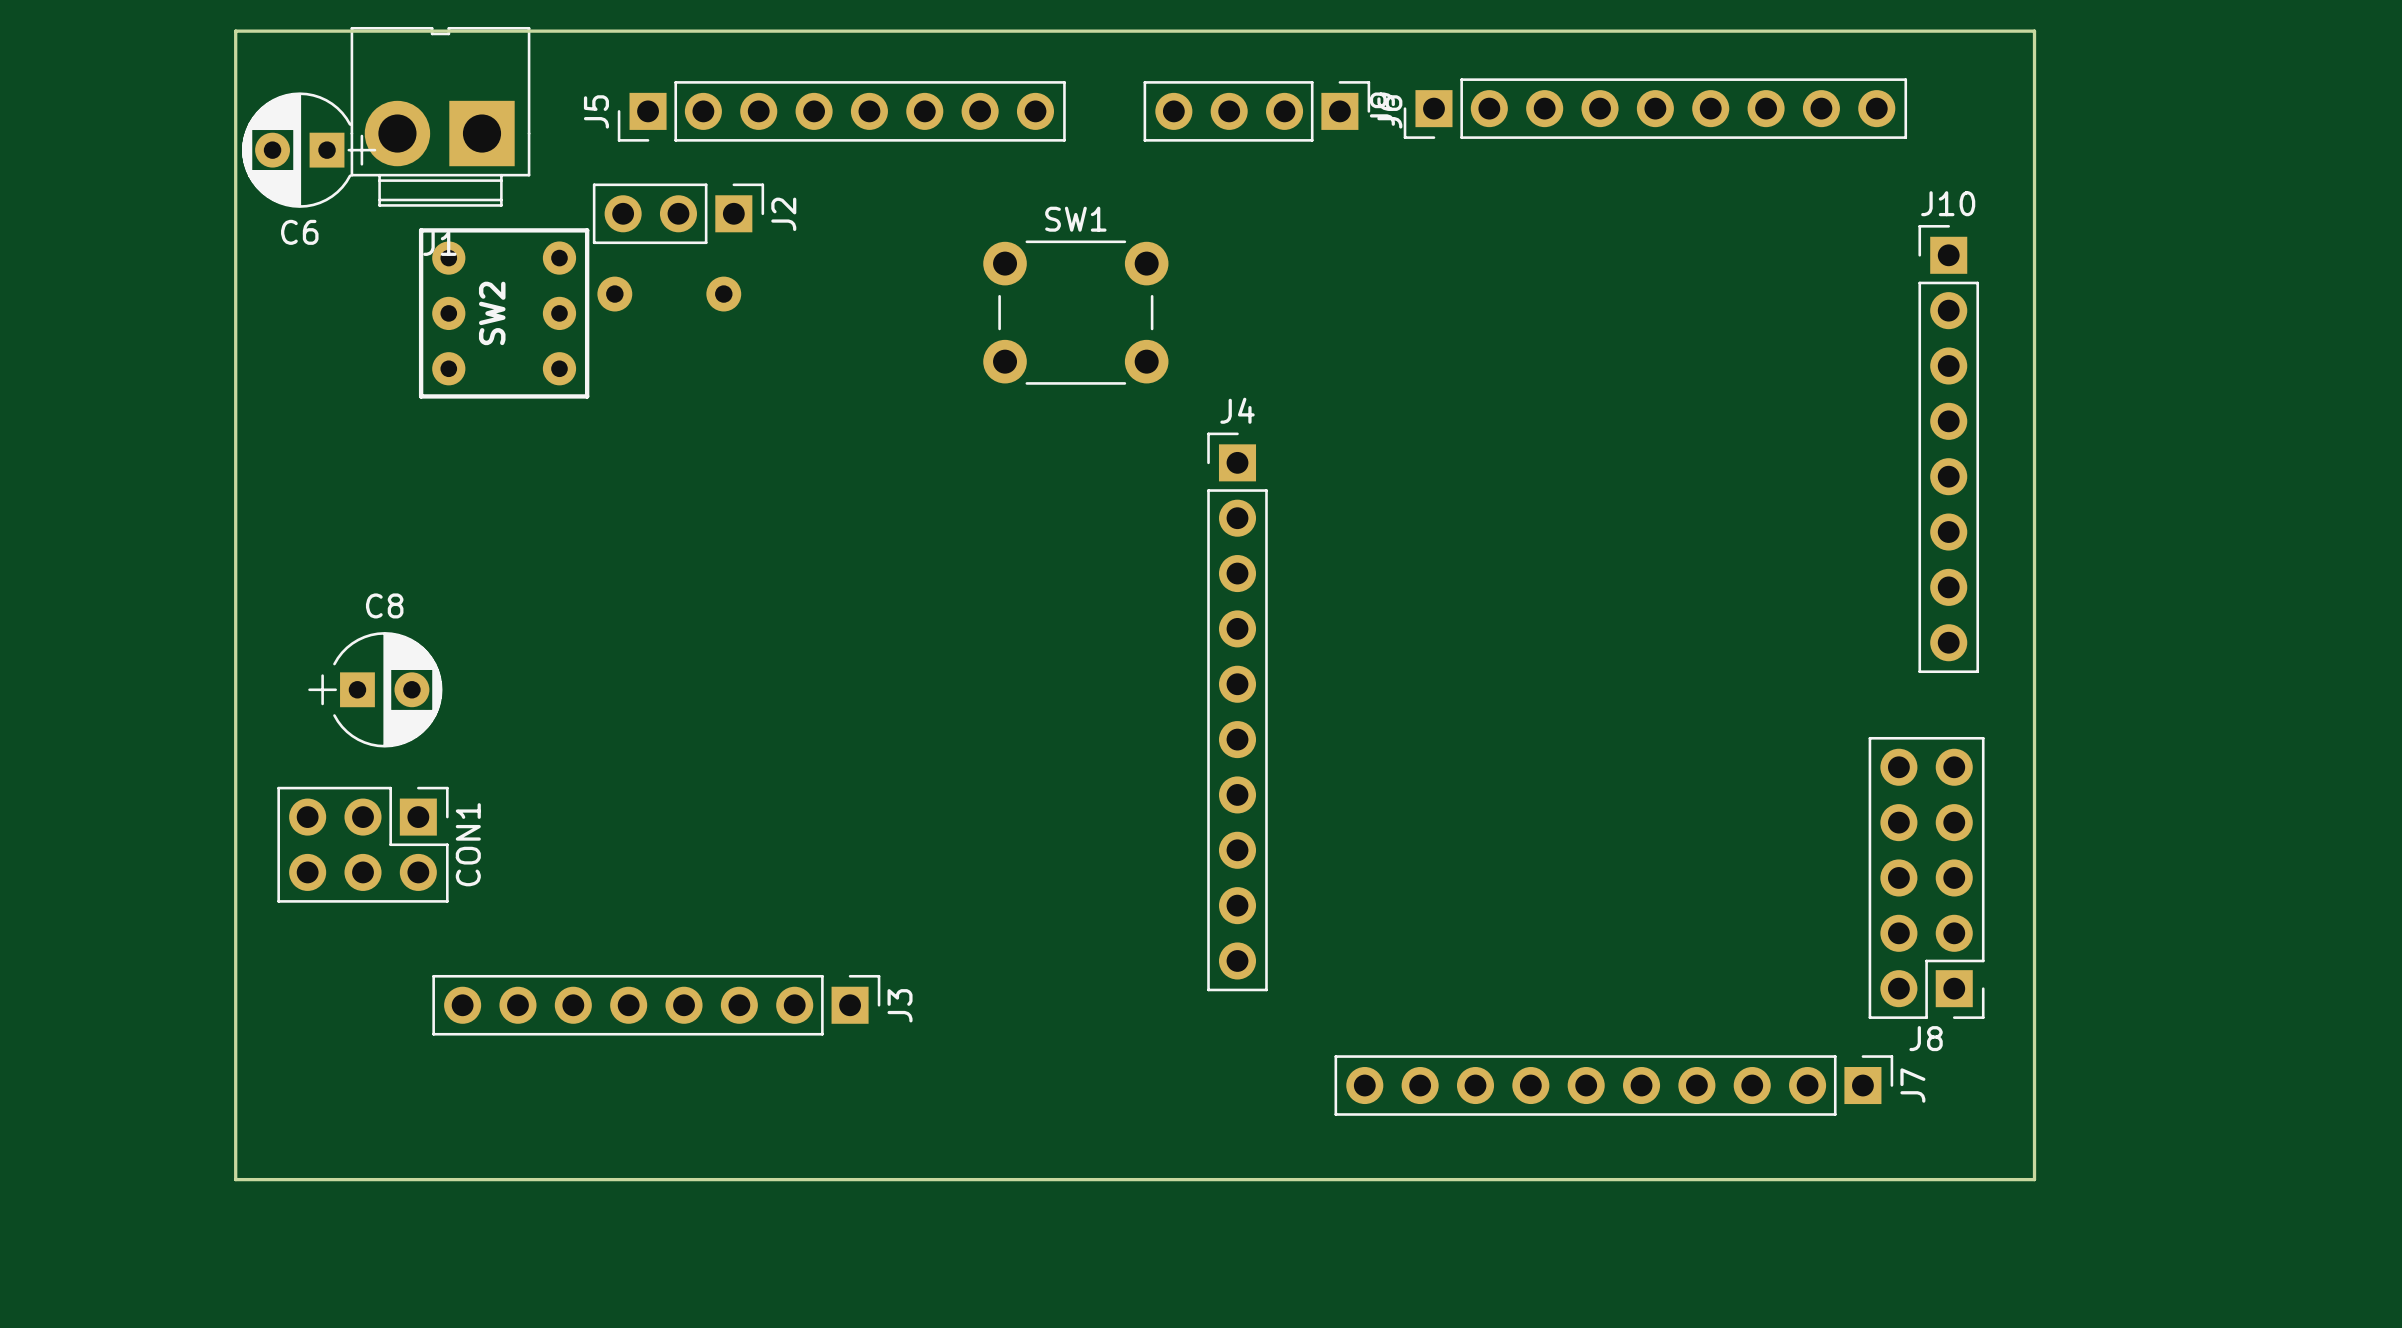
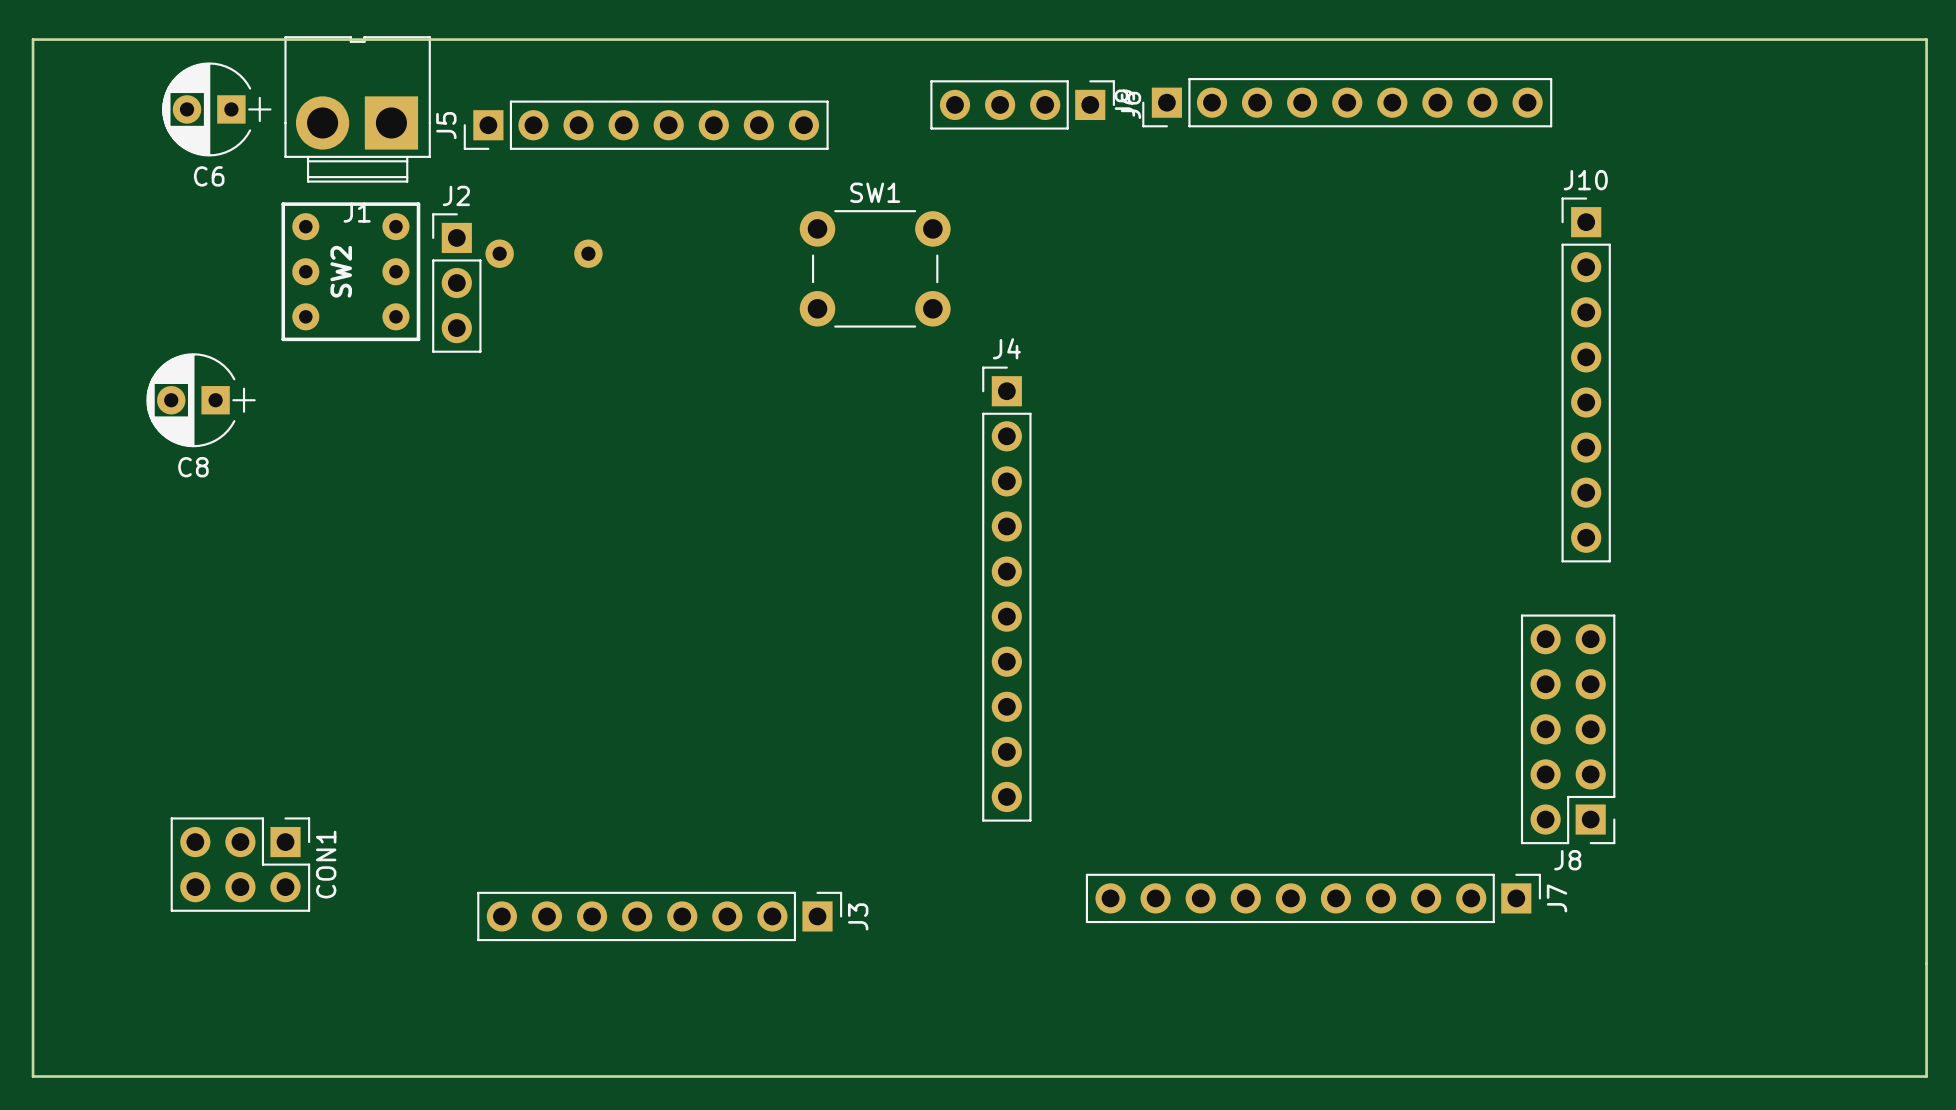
board edge: (235, 31) (235, 1179) (2034, 1179) (2034, 31) -> (190, 39) (33, 39) (33, 1076) (1926, 1076) (1926, 39) (1656, 39)
J5 position: (841, 111) -> (646, 125)
C6 position: (309, 150) -> (216, 109)
J2 rotation: 0° (678, 213) -> 90° counterclockwise (456, 283)
J2 position: (678, 213) -> (456, 283)
SW2 position: (504, 313) -> (350, 271)
C8 rotation: 0° (375, 689) -> 180° (201, 400)
C8 position: (375, 689) -> (201, 400)
CON1 position: (363, 844) -> (240, 864)
J3 position: (656, 1005) -> (659, 916)

